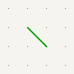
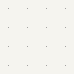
wire: (27, 27) (46, 46) -> none

